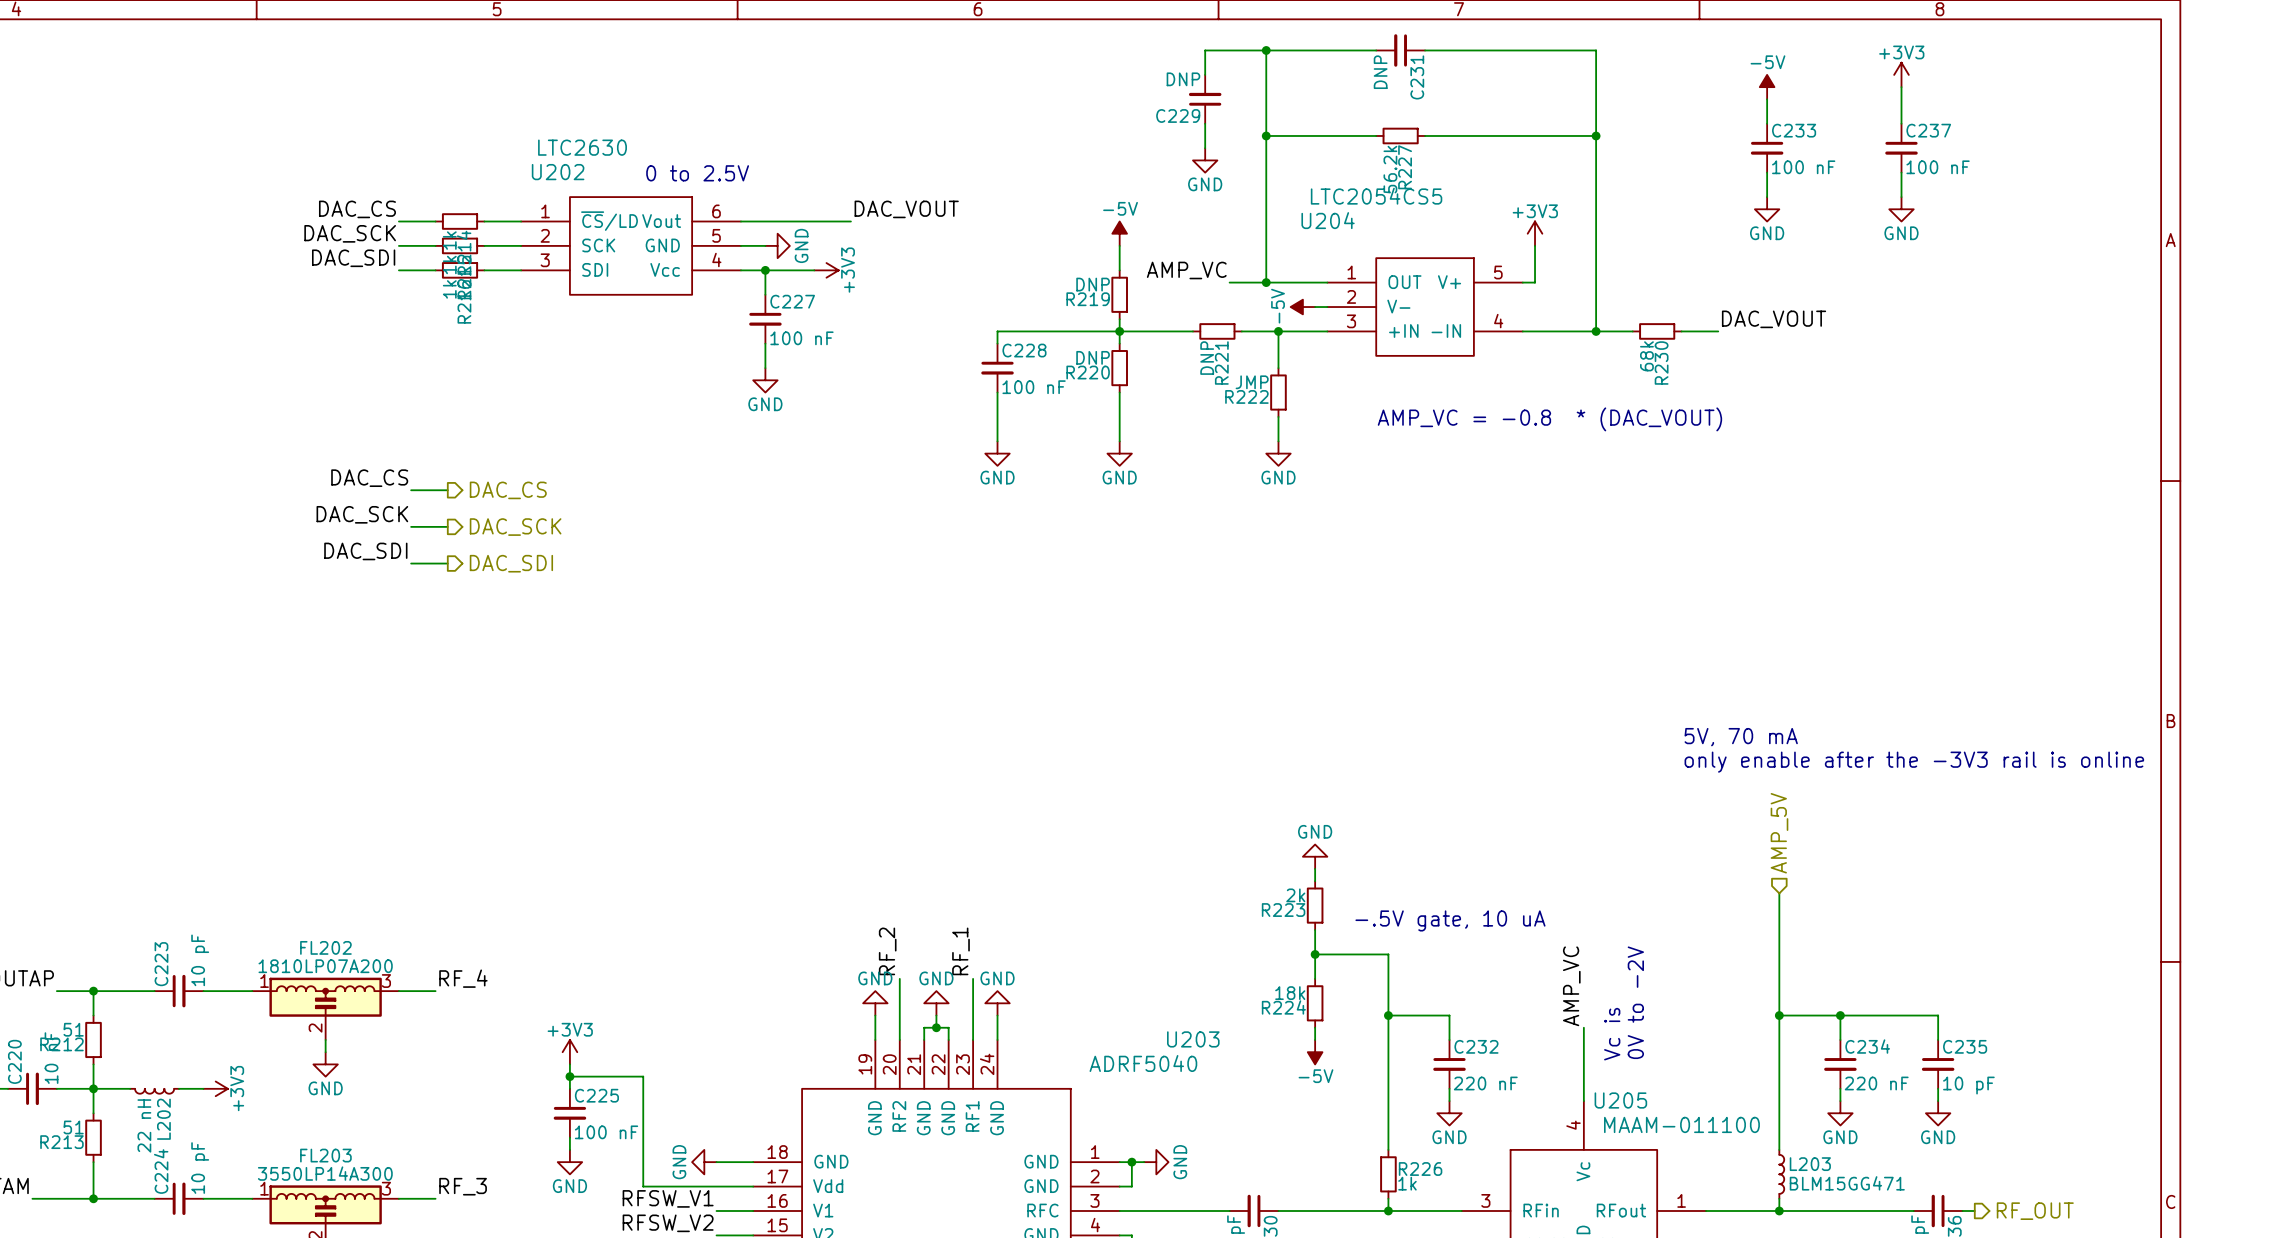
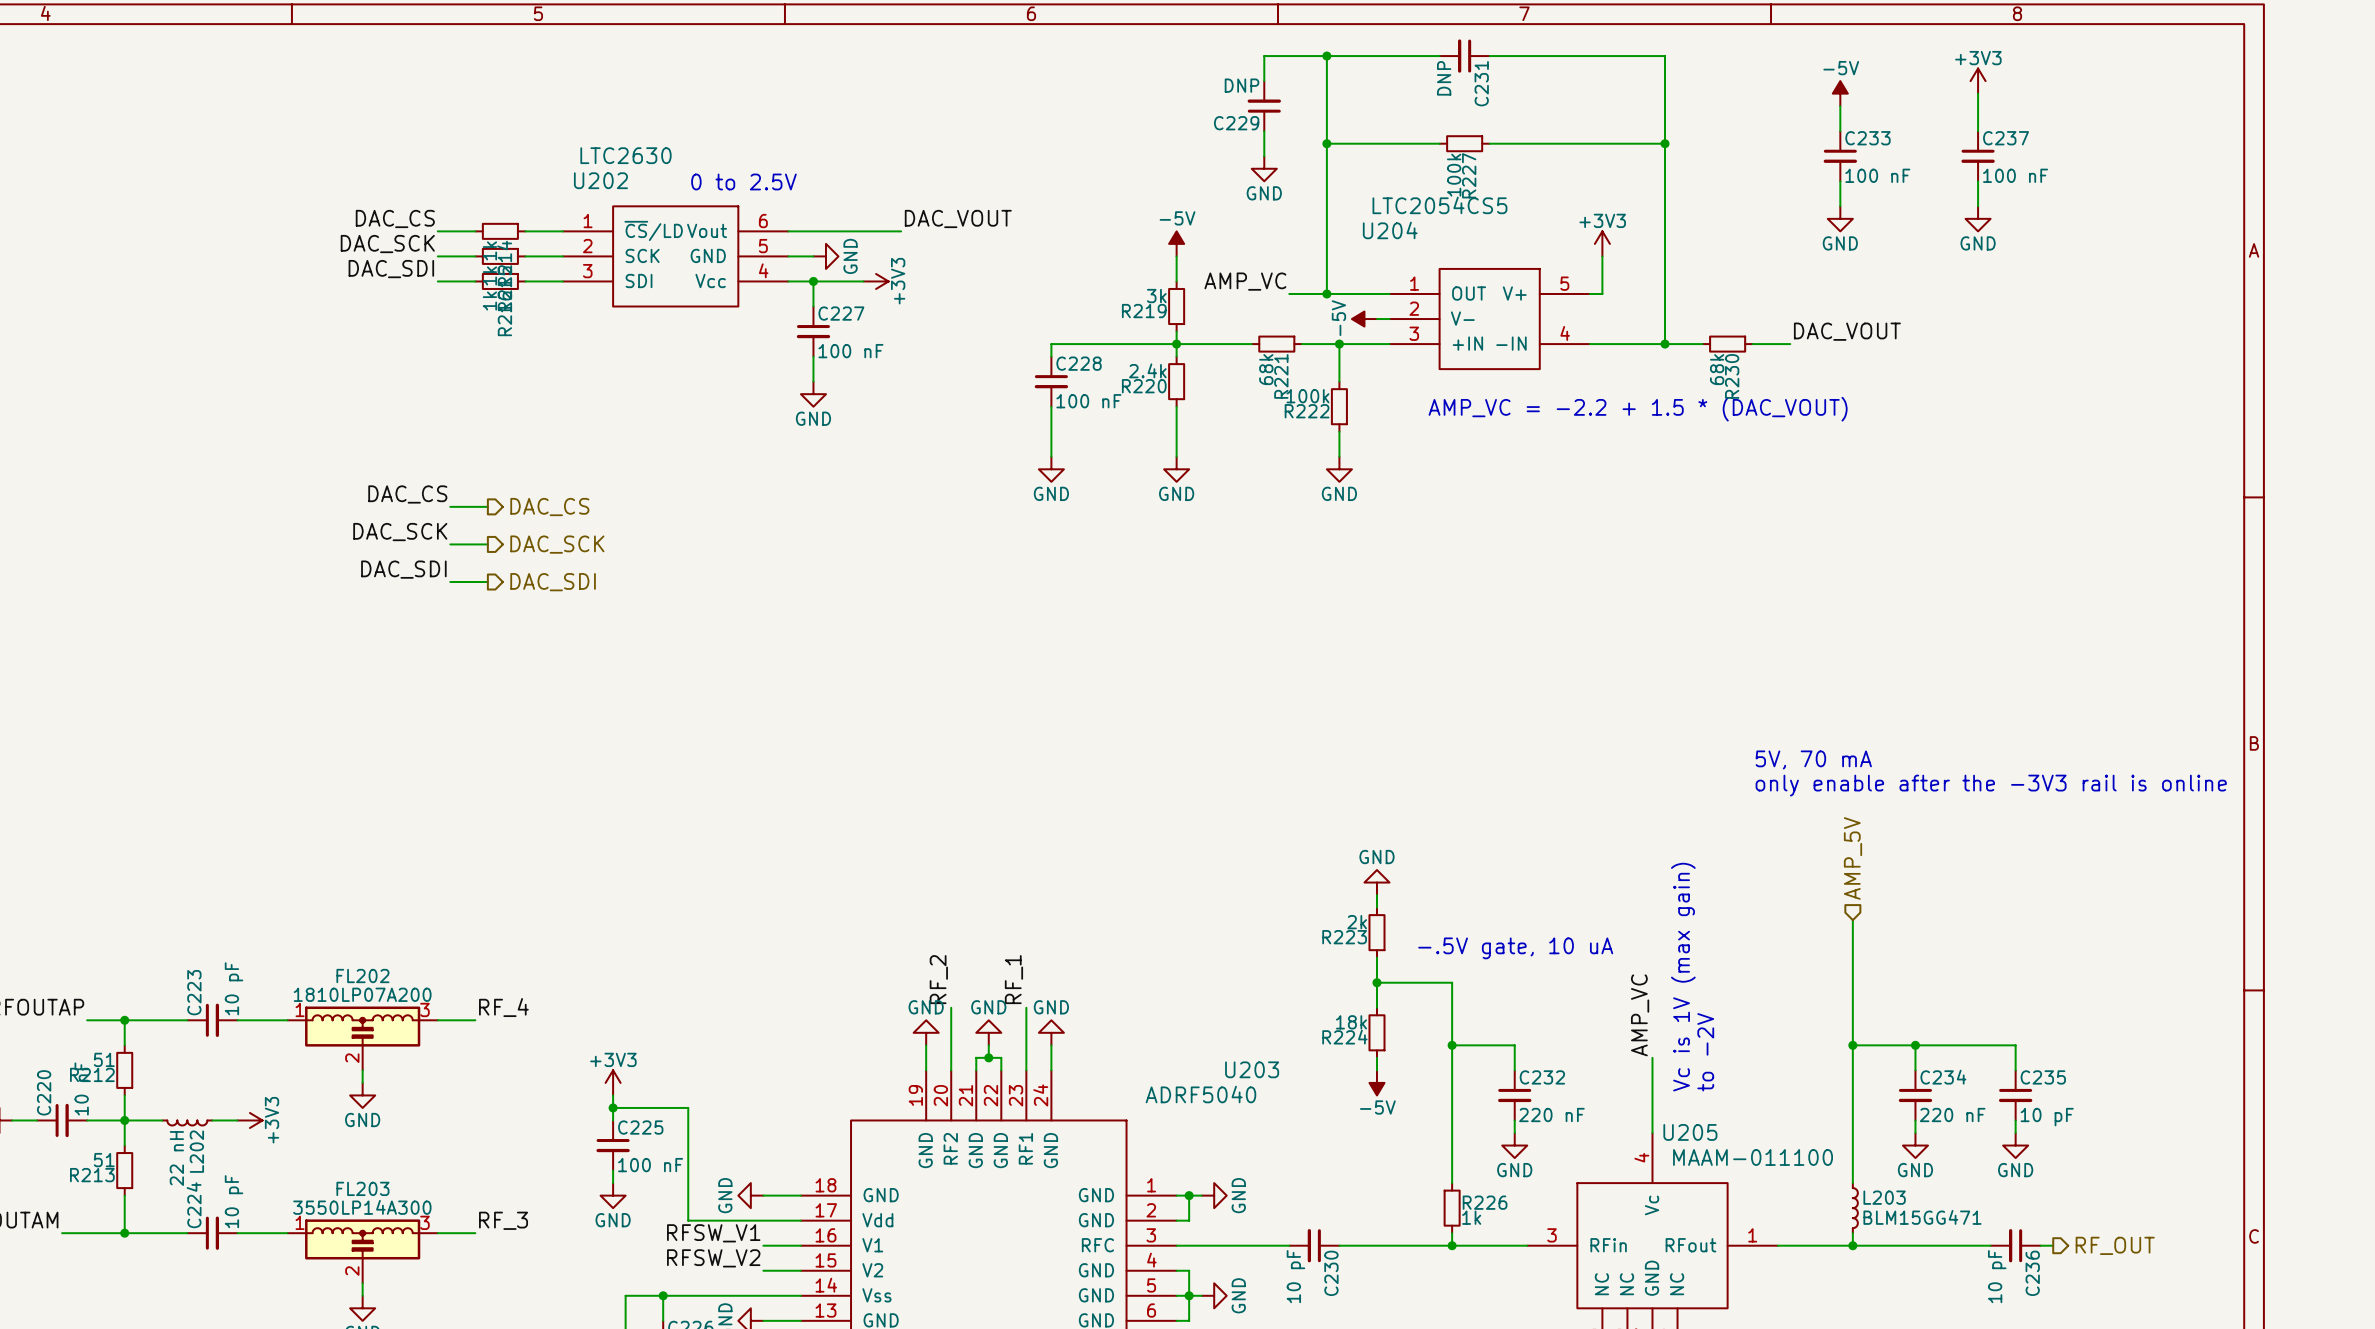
R227 value: 56.2k (1390, 169) -> 100k (1454, 175)
R219 value: DNP (1093, 284) -> 3k (1156, 296)
R220 value: DNP (1093, 357) -> 2.4k (1147, 370)
R221 value: DNP (1207, 358) -> 68k (1266, 369)
R222 value: JMP (1252, 382) -> 100k (1307, 396)
text: AMP_VC = -0.8 * (DAC_VOUT) (1549, 419) -> AMP_VC = -2.2 + 1.5 * (DAC_VOUT) (1638, 409)
text: 0V to -2V (1635, 1002) -> to -2V (1705, 1052)
text: Vc is (1612, 1034) -> Vc is 1V (max gain) (1683, 977)

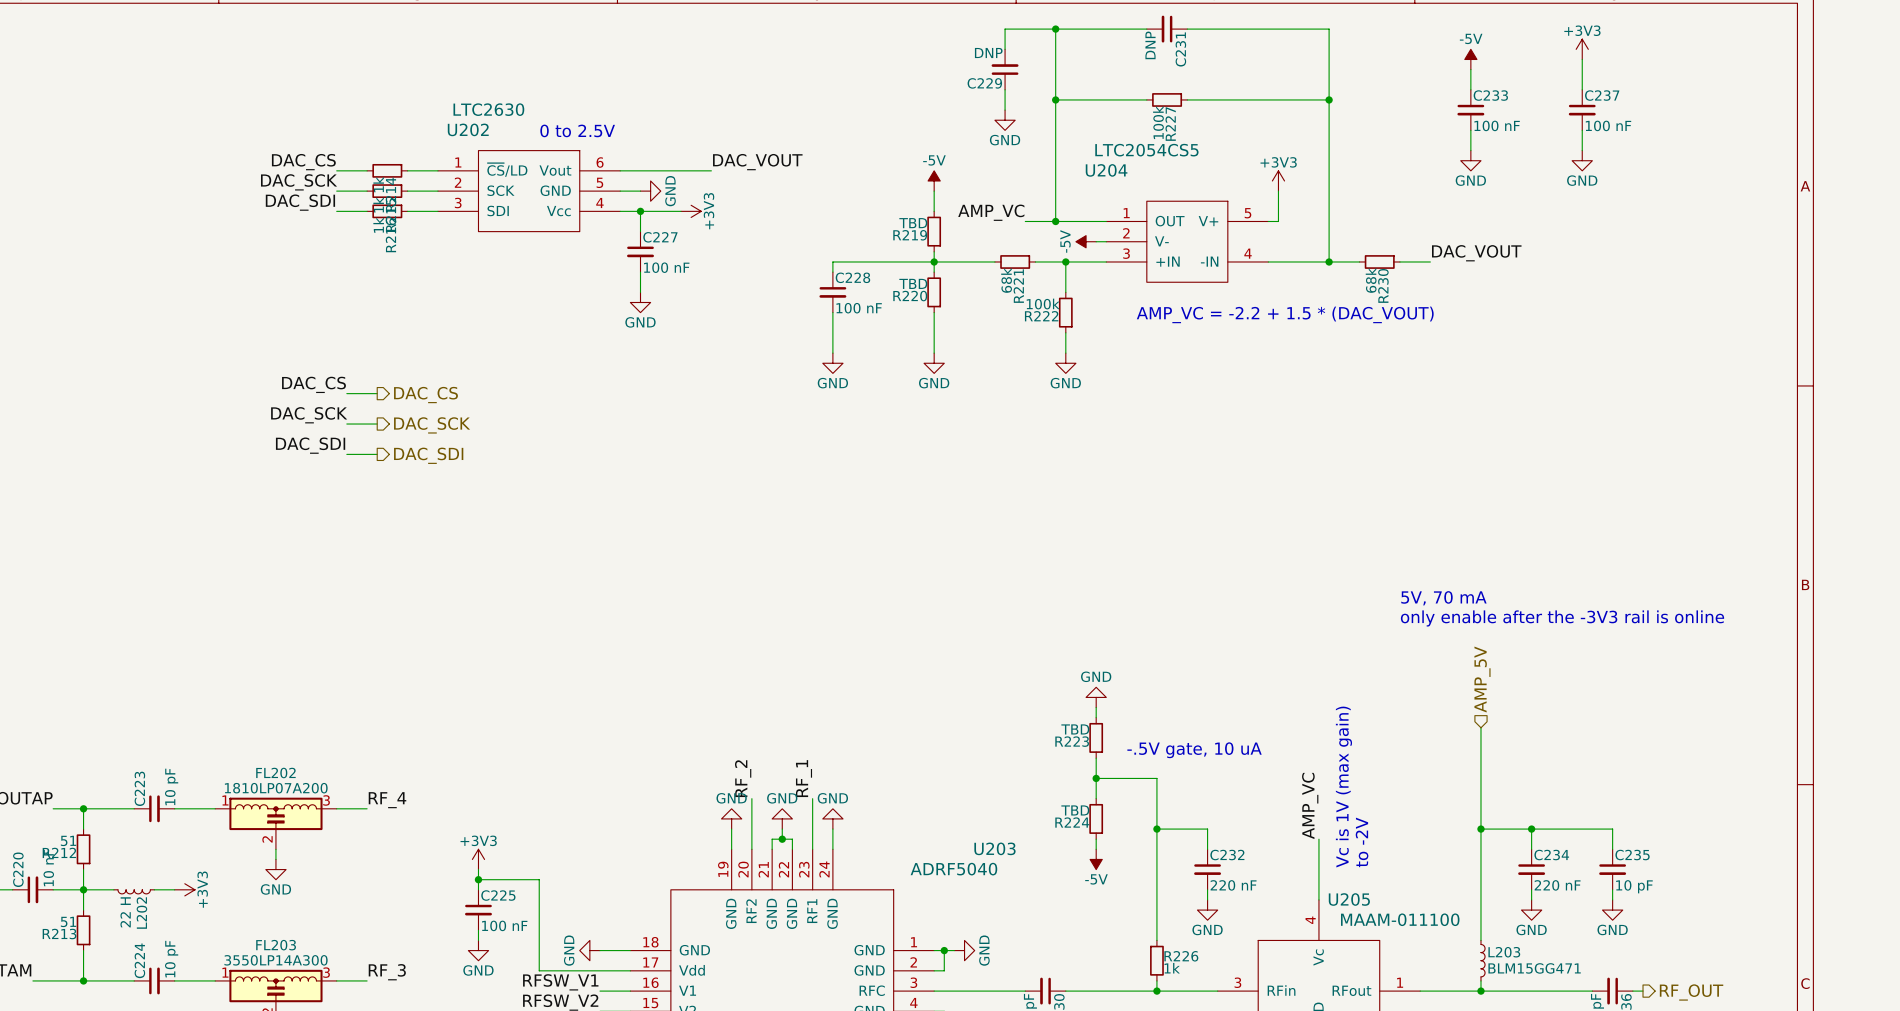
R219 value: 3k (1156, 296) -> TBD (913, 223)
R220 value: 2.4k (1147, 370) -> TBD (913, 283)
R223 value: 2k (1357, 922) -> TBD (1075, 729)
R224 value: 18k (1351, 1022) -> TBD (1075, 810)
L202 value: 22 nH (176, 1158) -> 22 H (125, 912)

